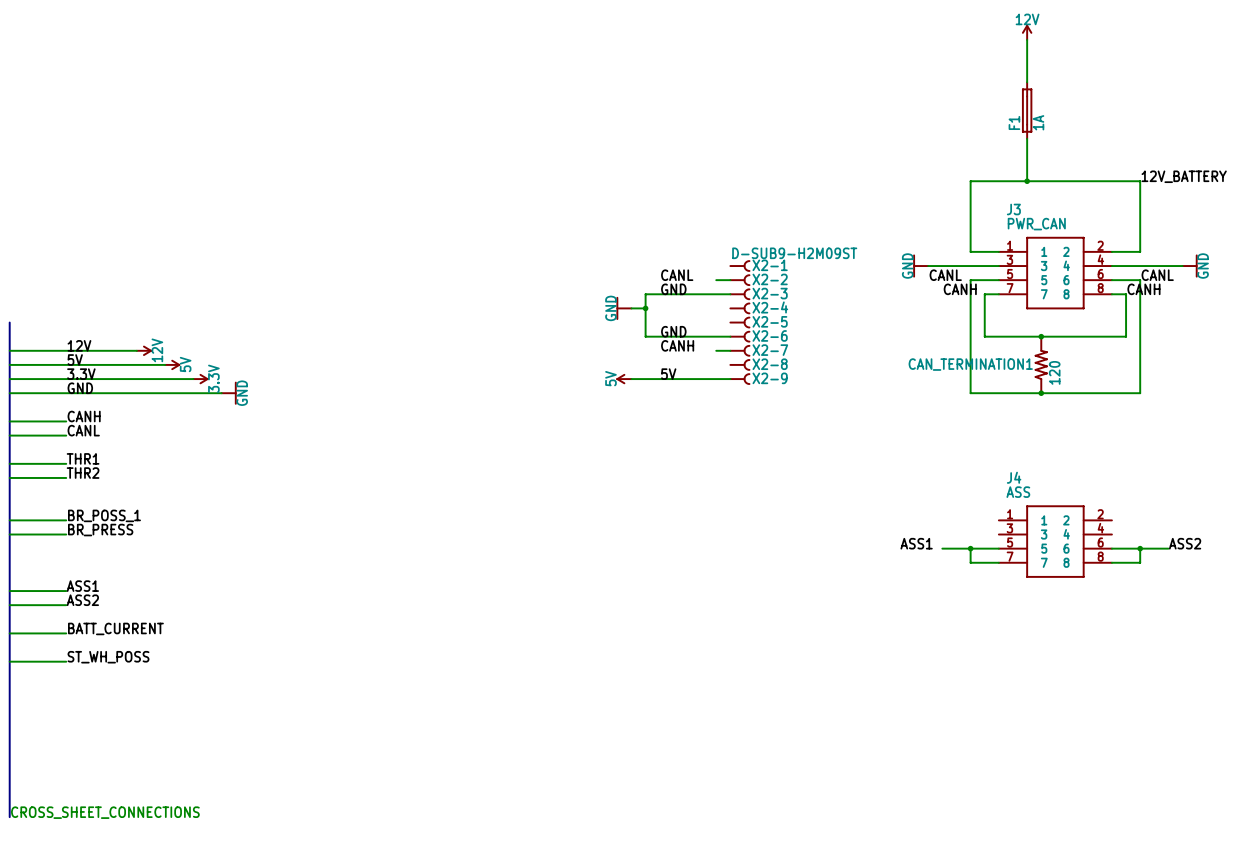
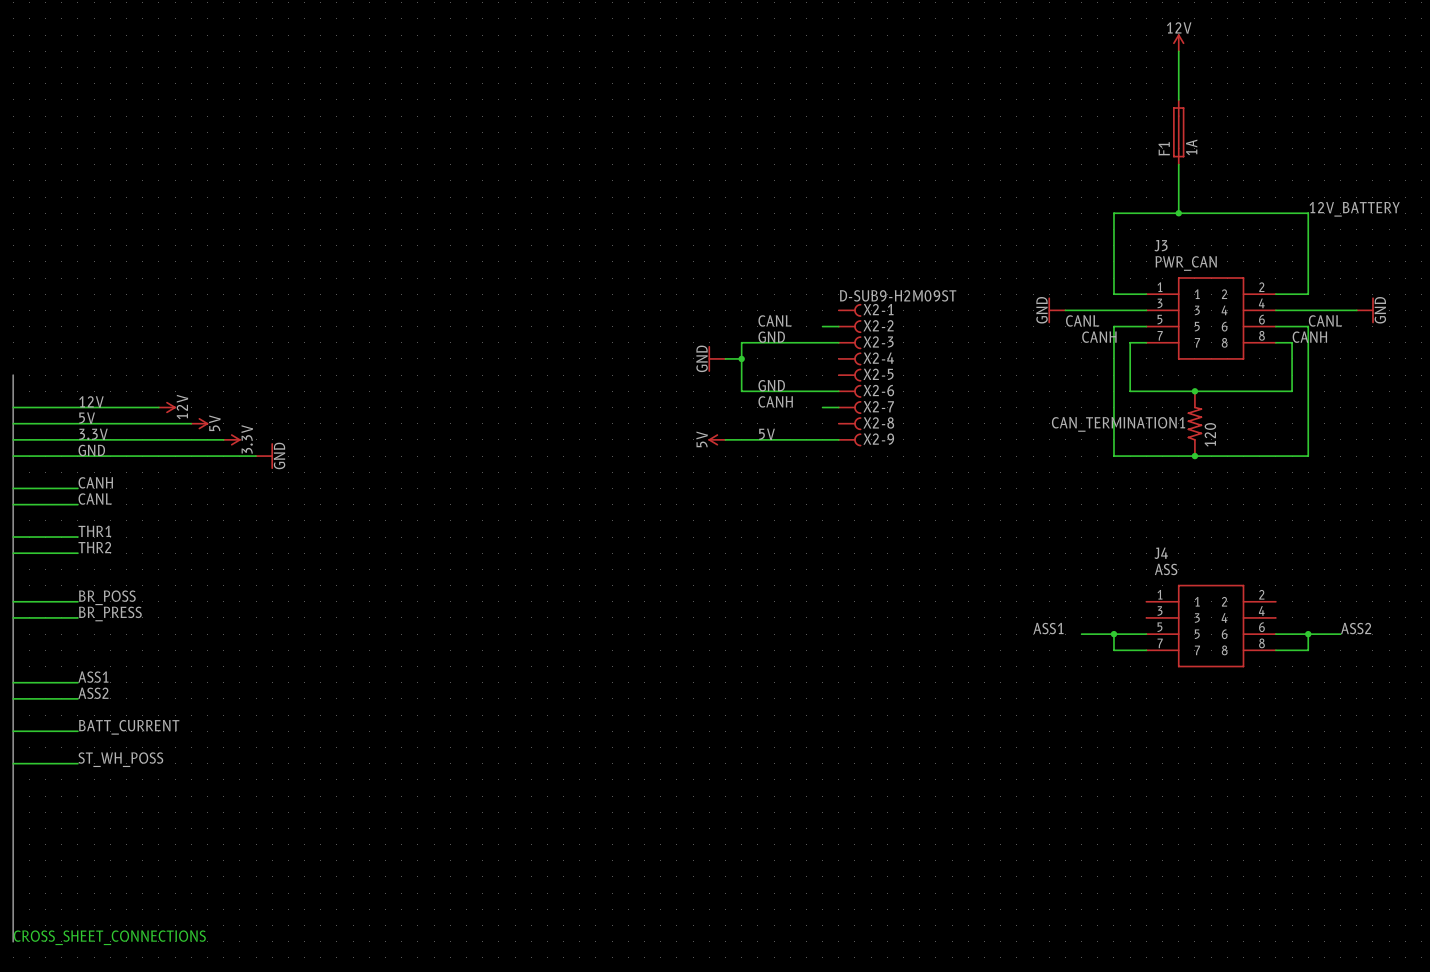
label: BR_POSS_1 (104, 515) -> BR_POSS (107, 597)

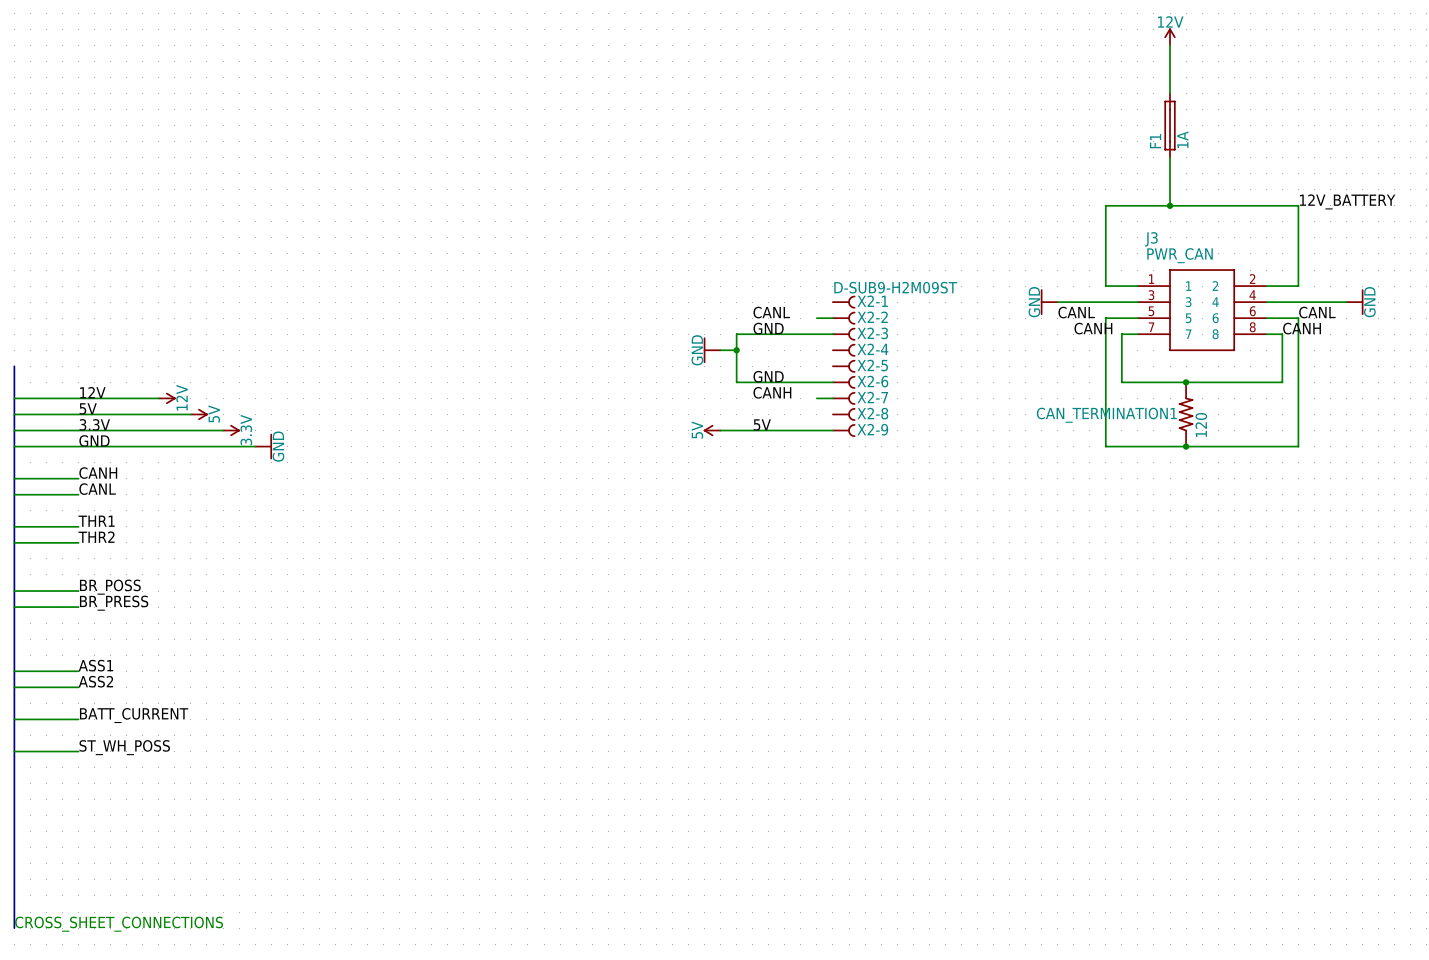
J4: ASS (1211, 626) -> none
label: ASS1 (1048, 628) -> none
label: ASS2 (1356, 628) -> none
wire: (1081, 634) (1146, 634) -> none
wire: (1113, 634) (1113, 650) (1146, 650) -> none
junction: (1113, 634) -> none
wire: (1275, 634) (1340, 634) -> none
wire: (1308, 634) (1308, 650) (1275, 650) -> none
junction: (1308, 634) -> none

